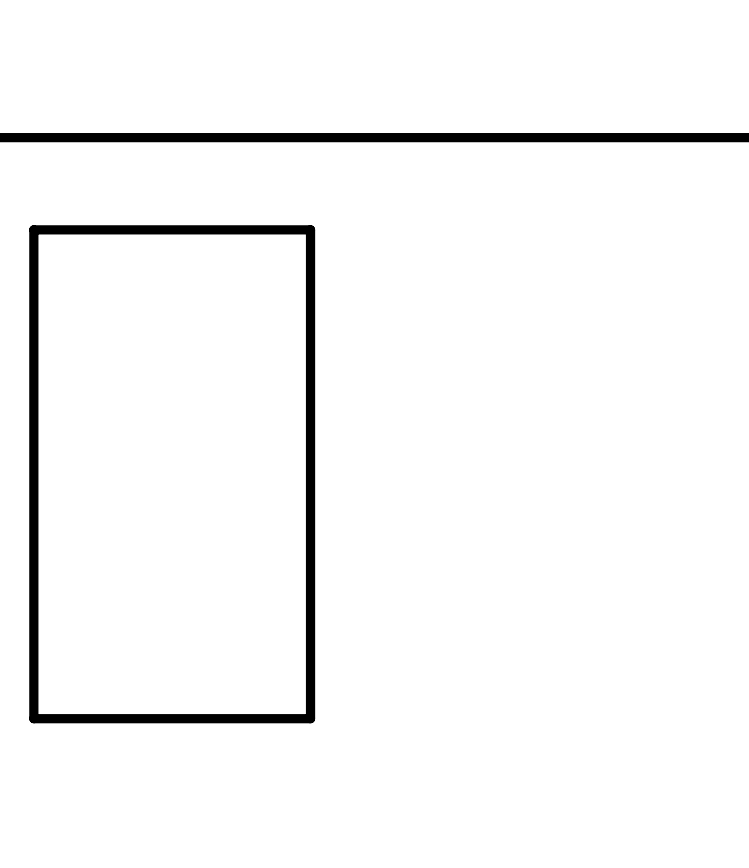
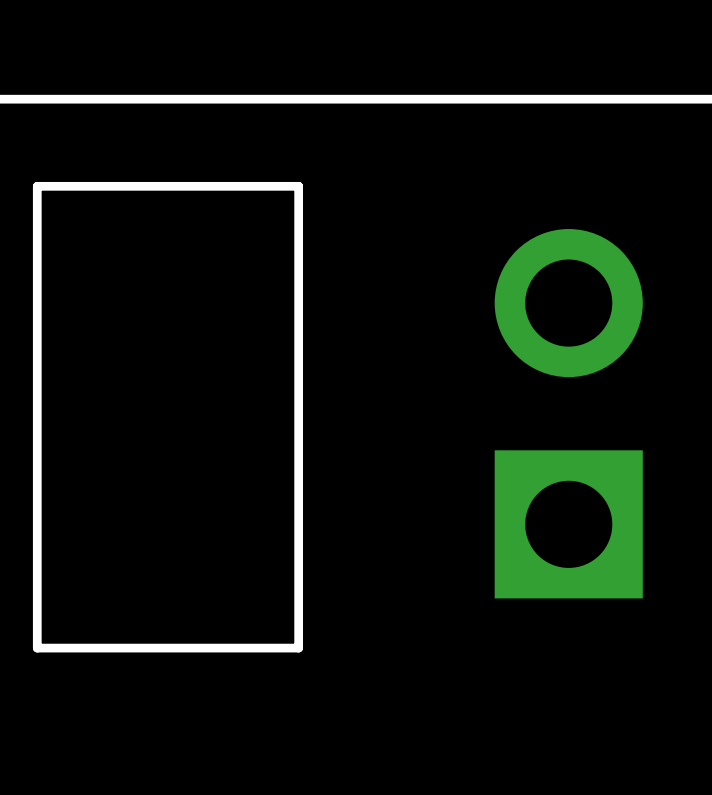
part: none -> (568, 413)

